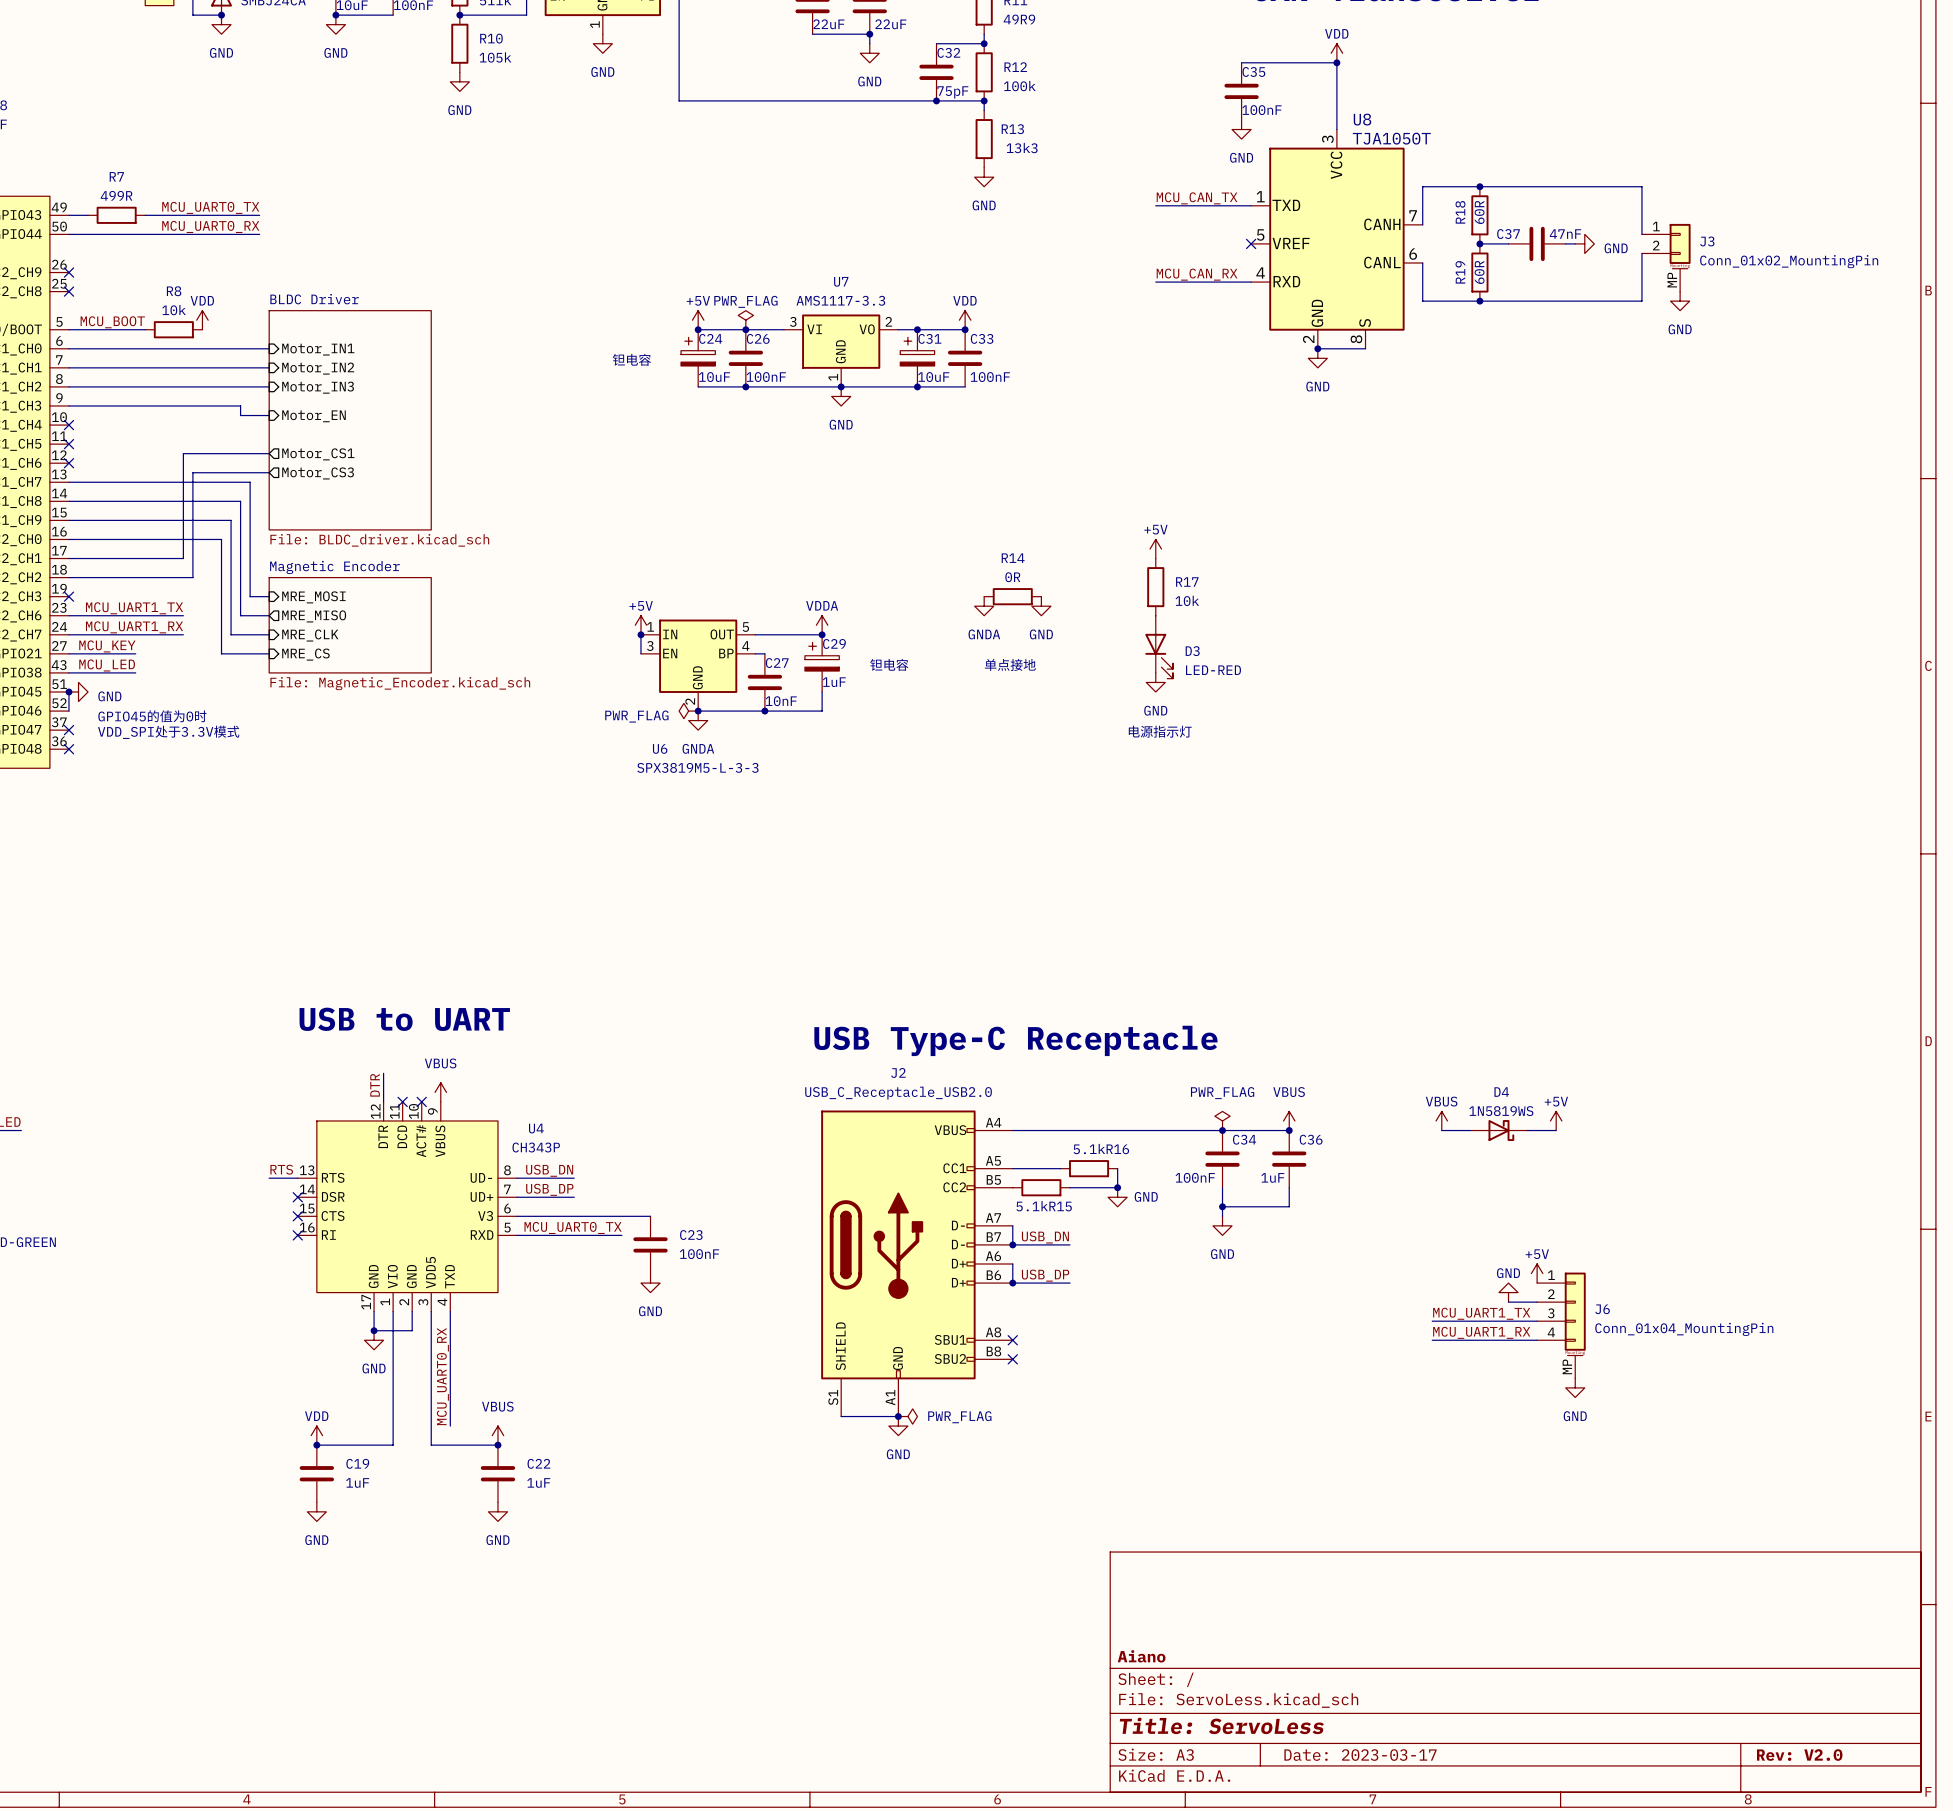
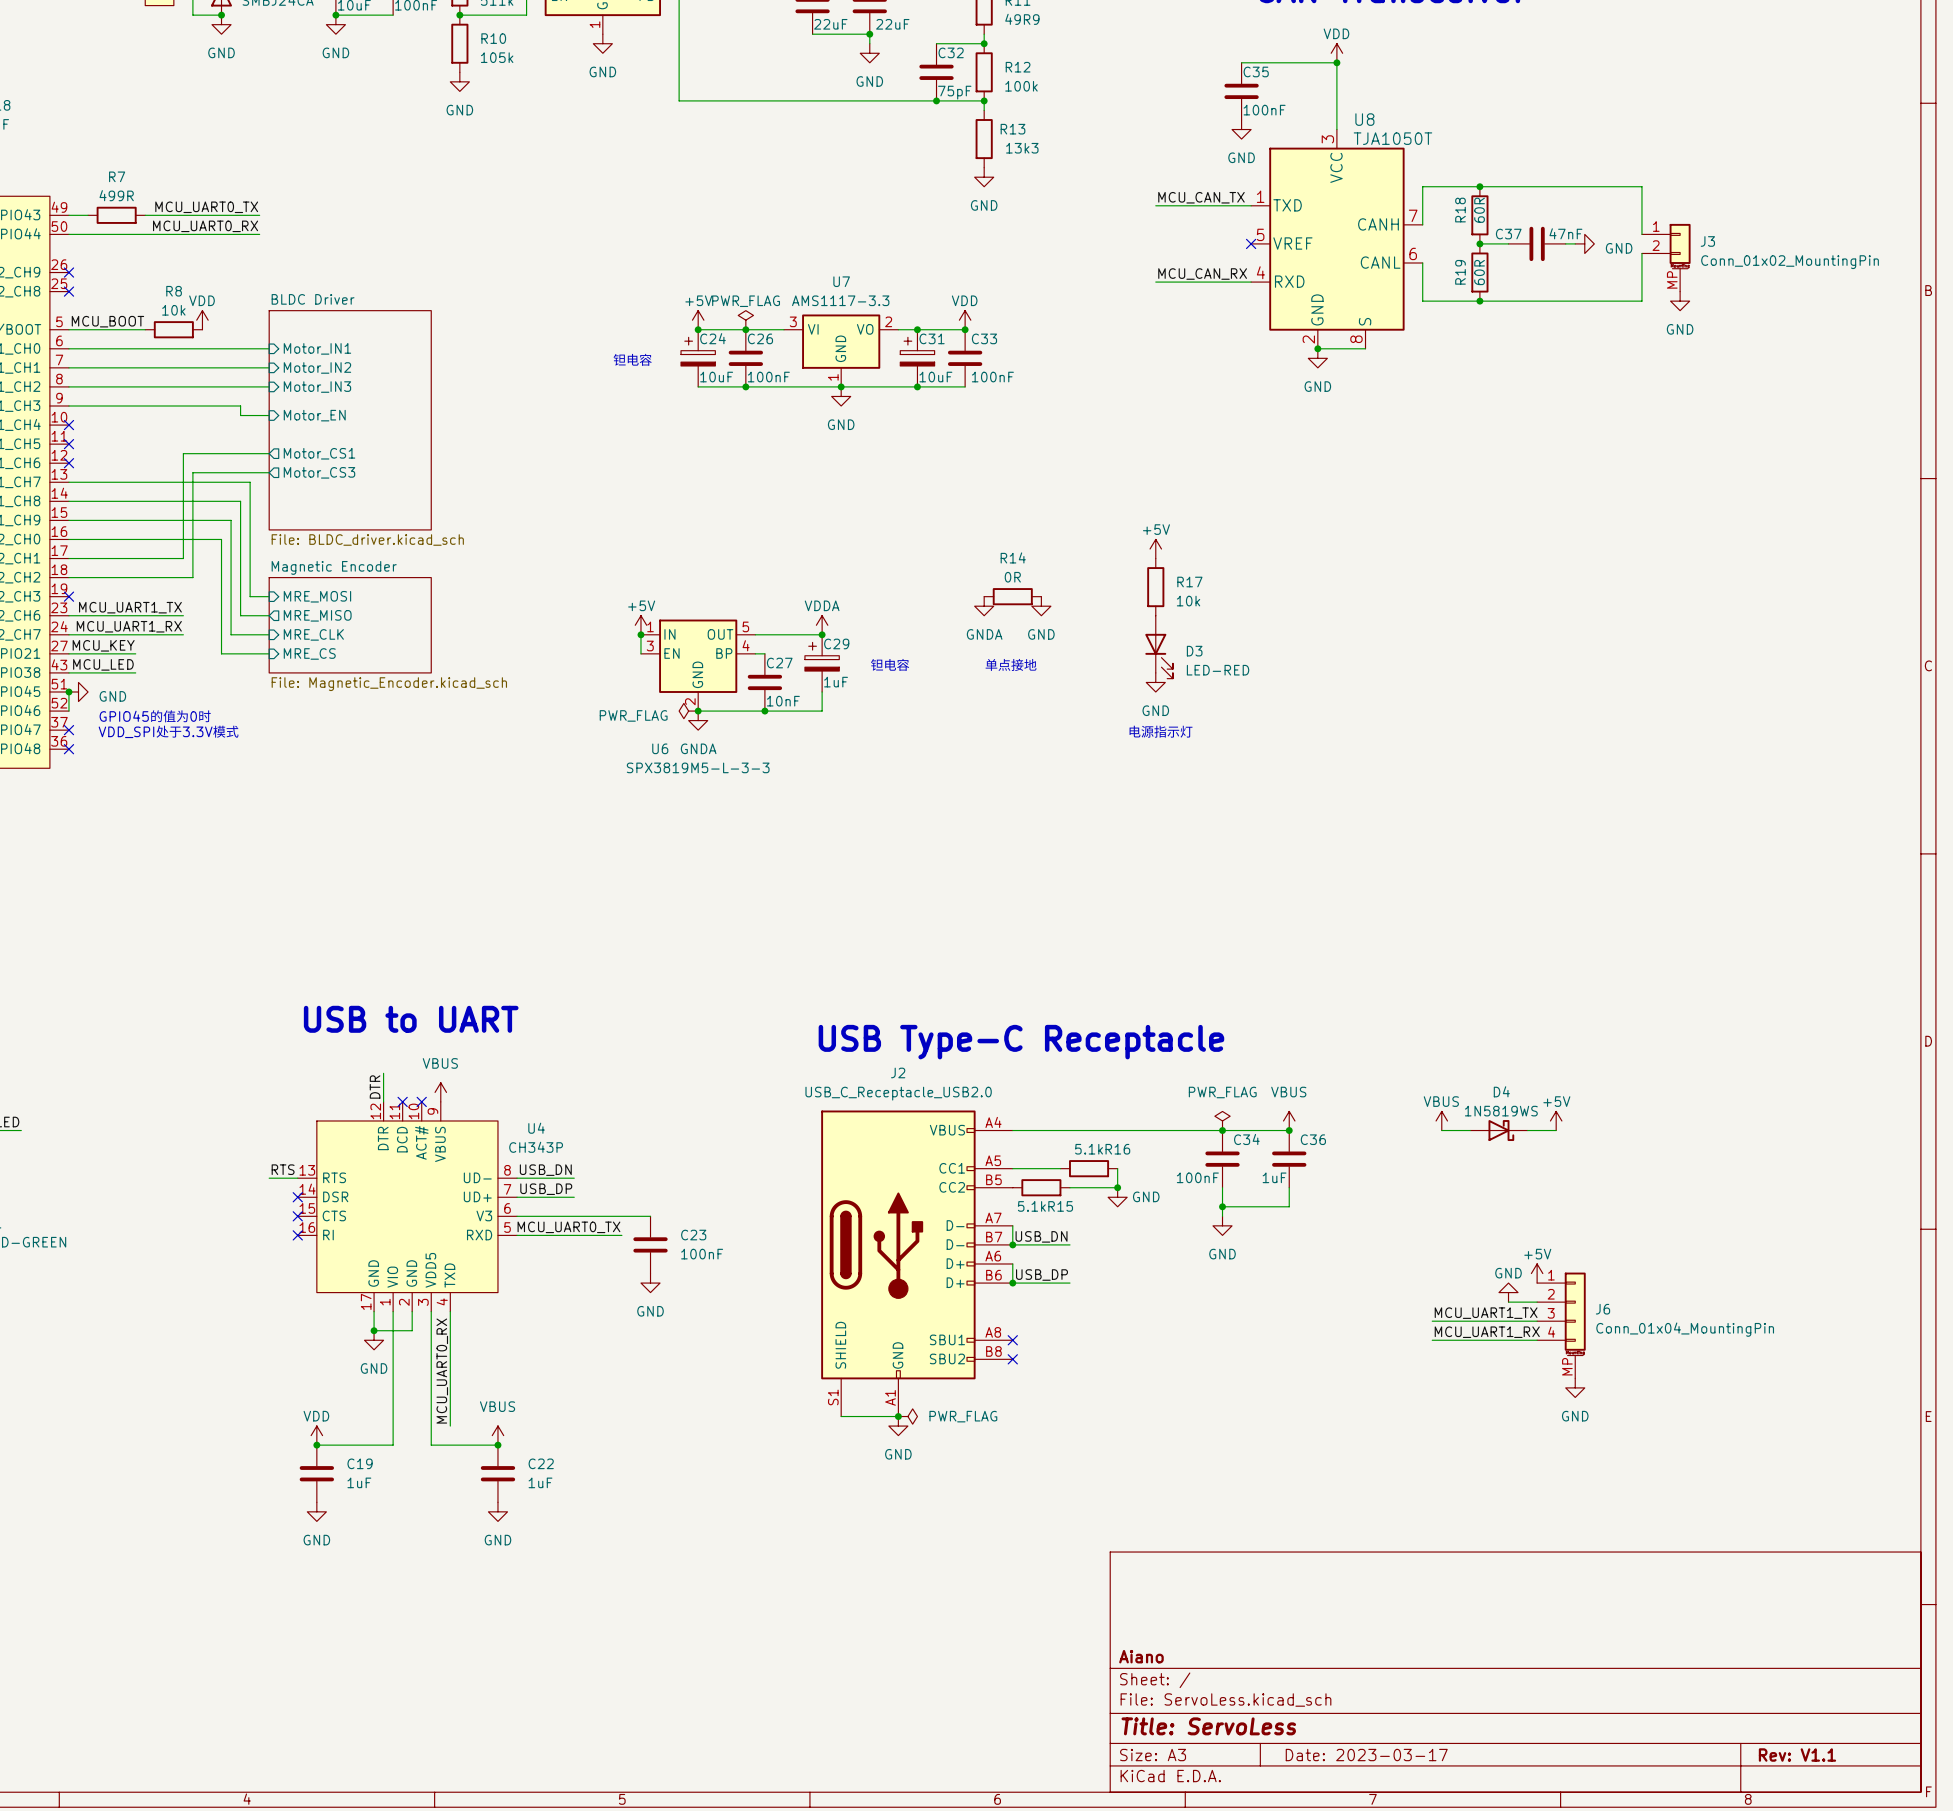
title block: Rev: V2.0 (1799, 1755) -> Rev: V1.1 (1797, 1755)

